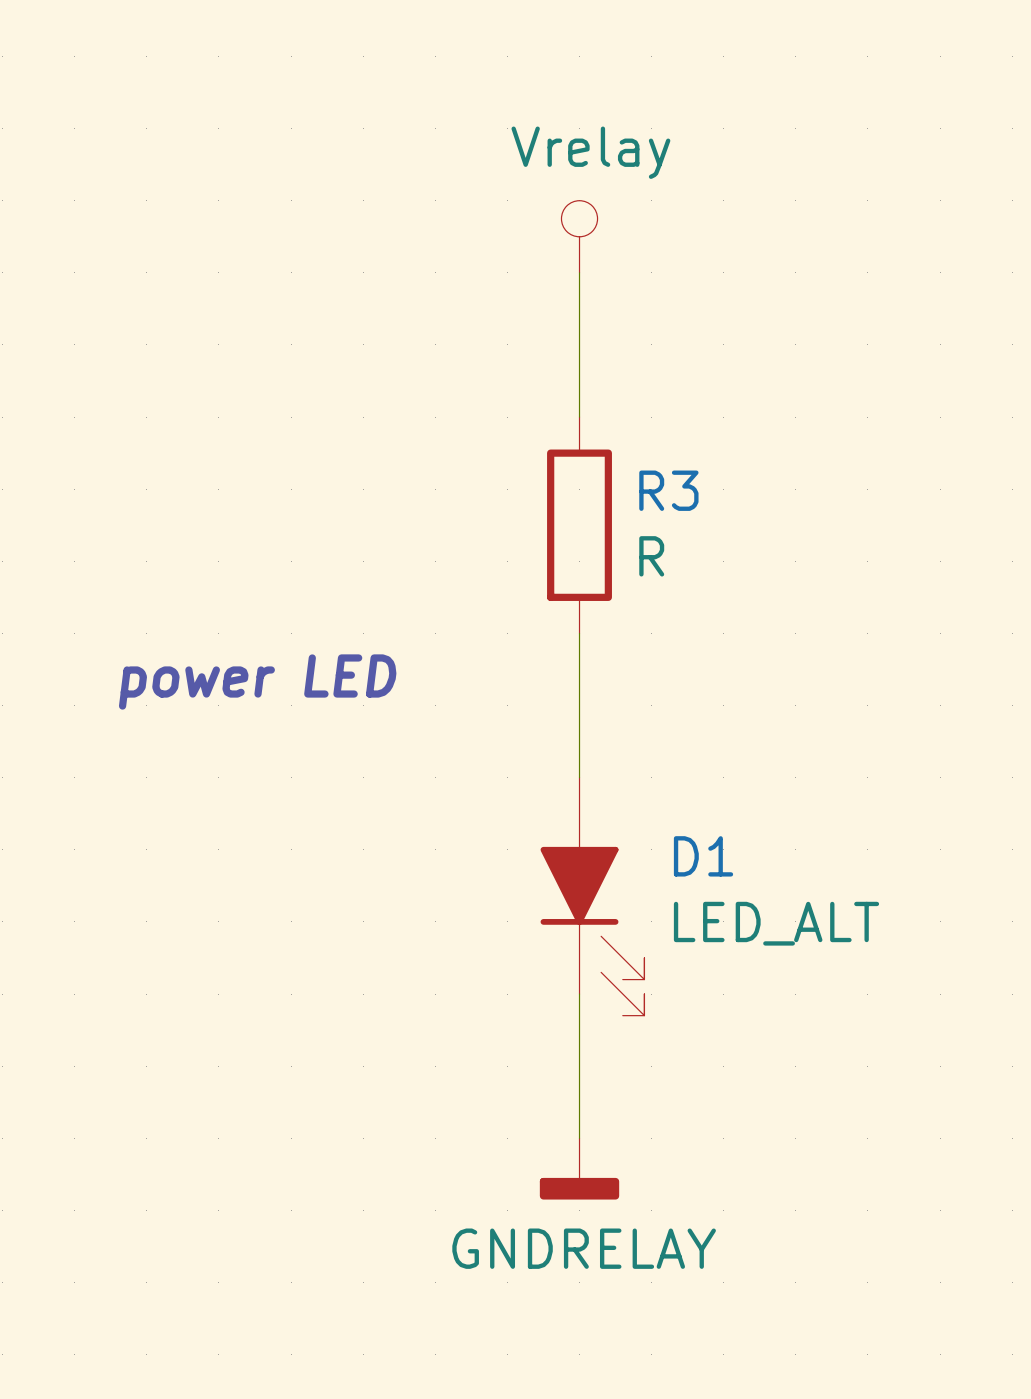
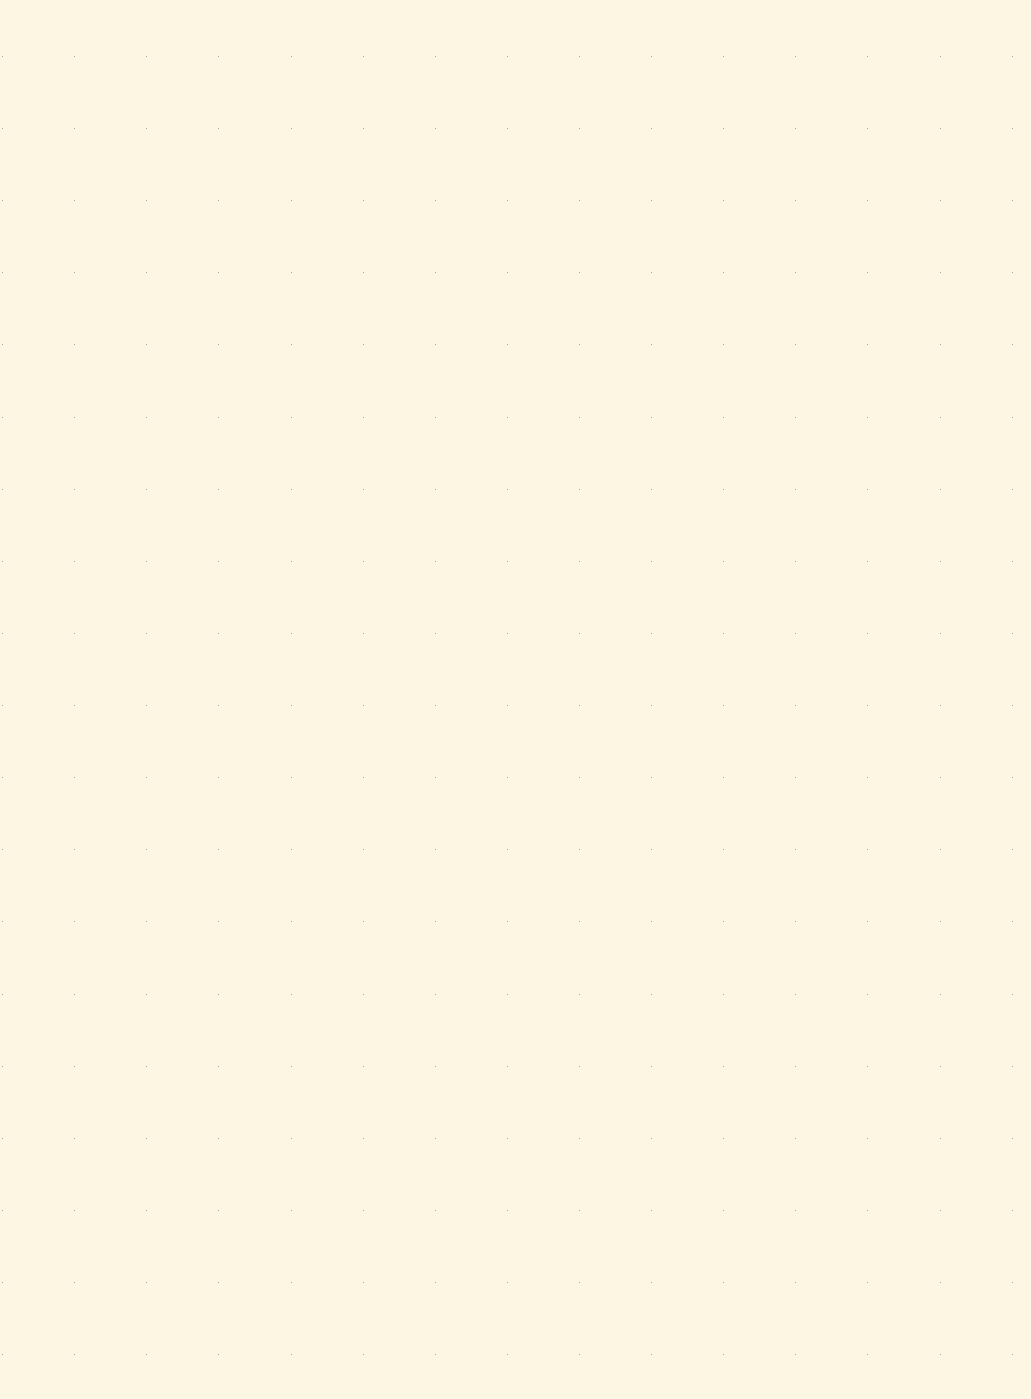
power symbol: Vrelay (579, 236) -> none
wire: (579, 272) (579, 417) -> none
R3: R (579, 525) -> none
wire: (579, 633) (579, 777) -> none
text: power LED (257, 682) -> none
D1: LED_ALT (592, 896) -> none
wire: (579, 994) (579, 1138) -> none
power symbol: GNDRELAY (579, 1168) -> none

